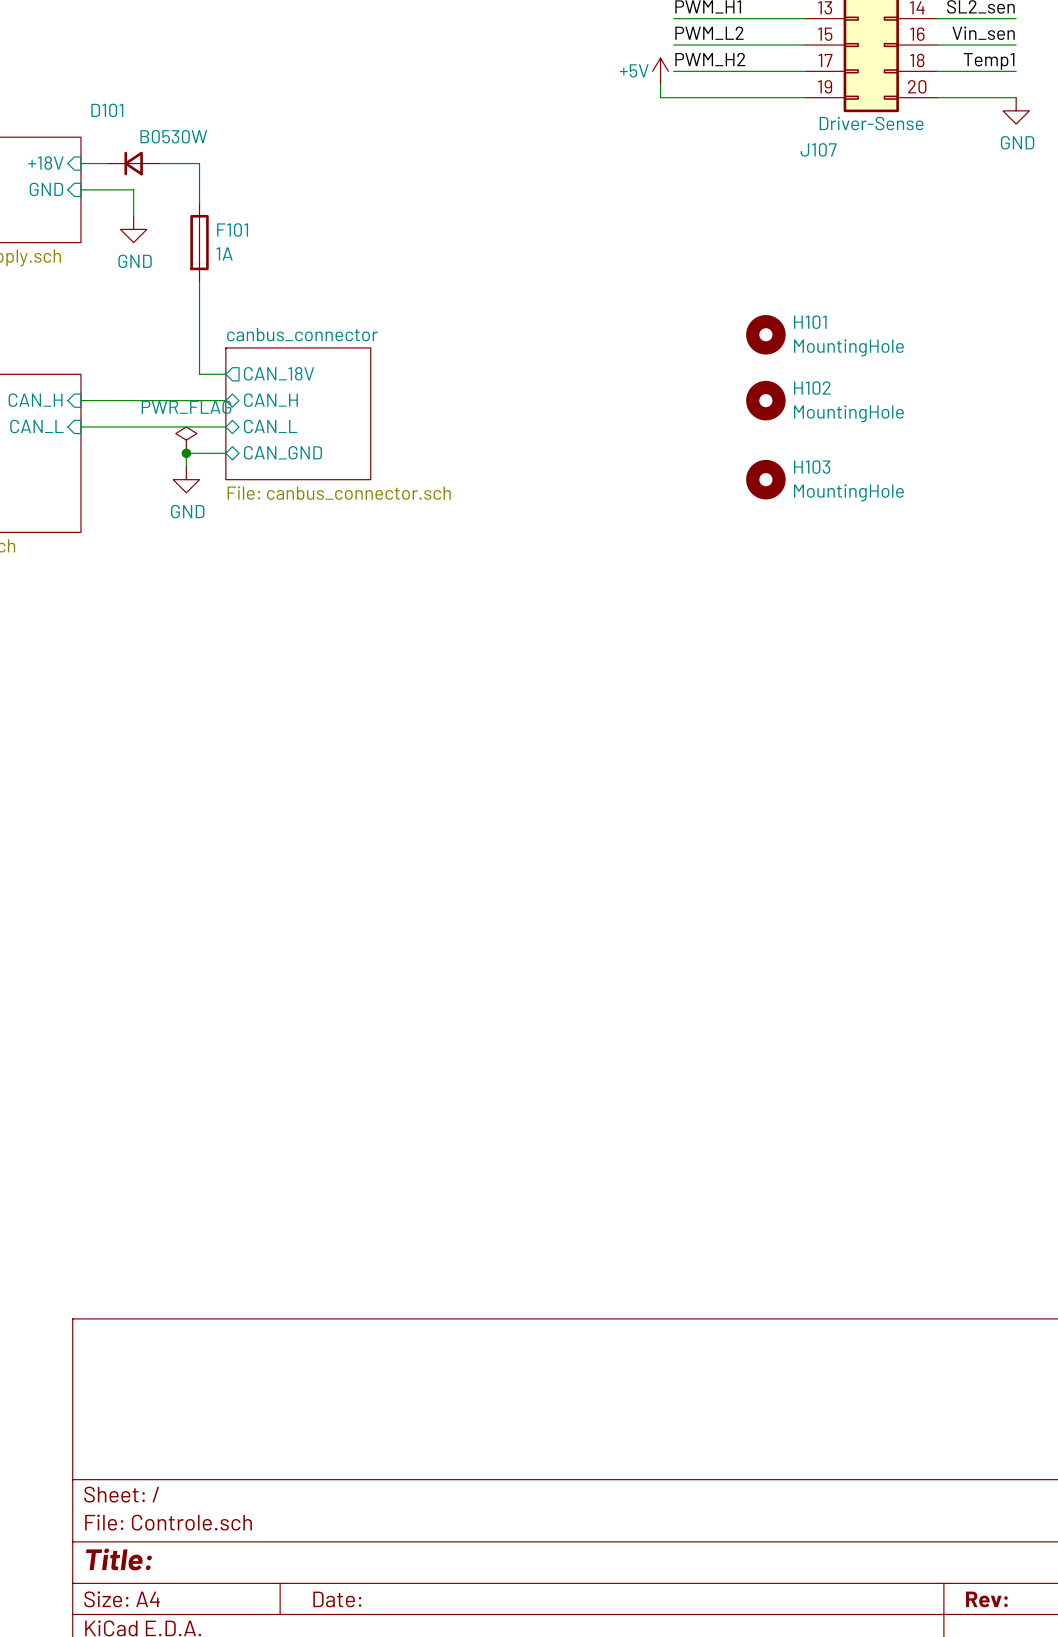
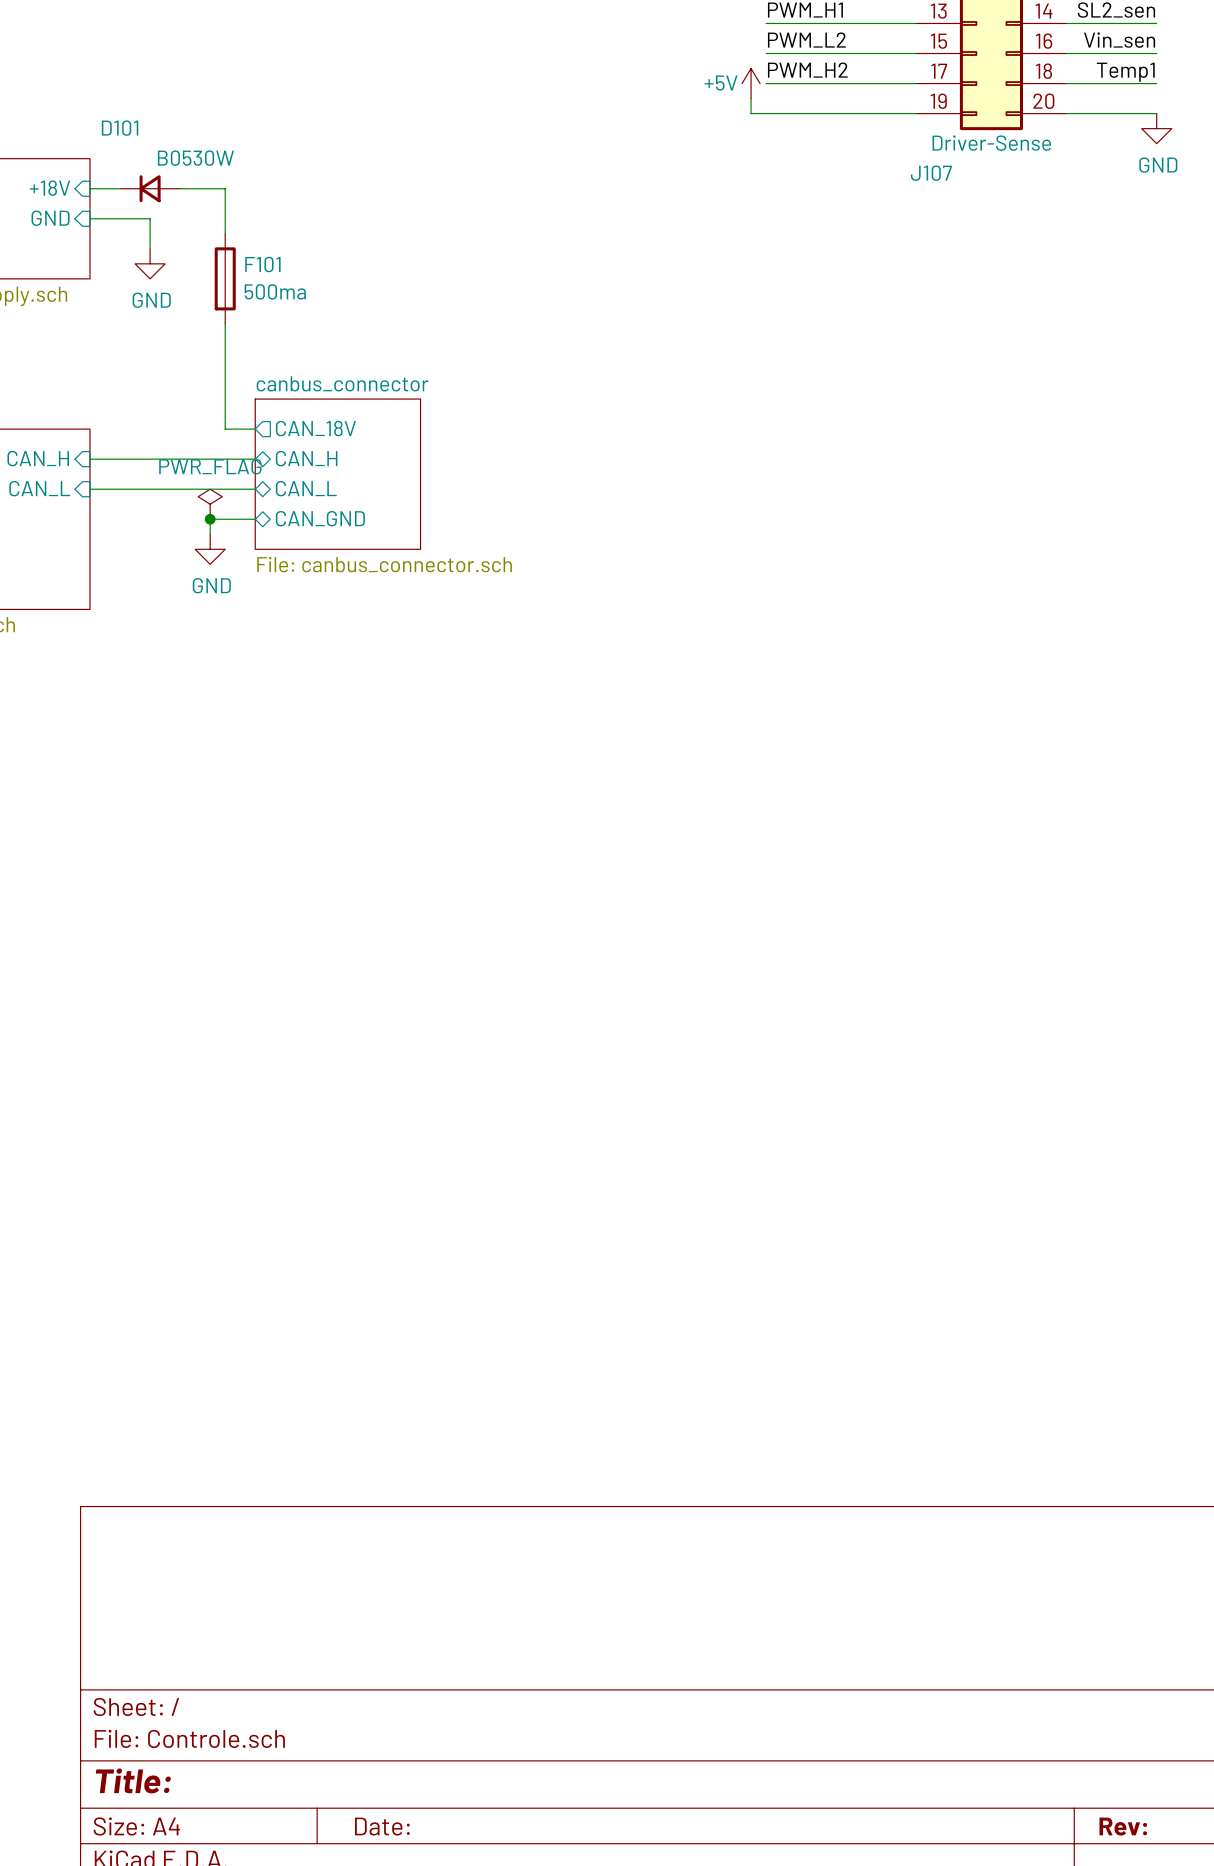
F101 value: 1A (224, 253) -> 500ma (275, 291)
H101: MountingHole (765, 334) -> none
H102: MountingHole (765, 400) -> none
H103: MountingHole (765, 479) -> none

